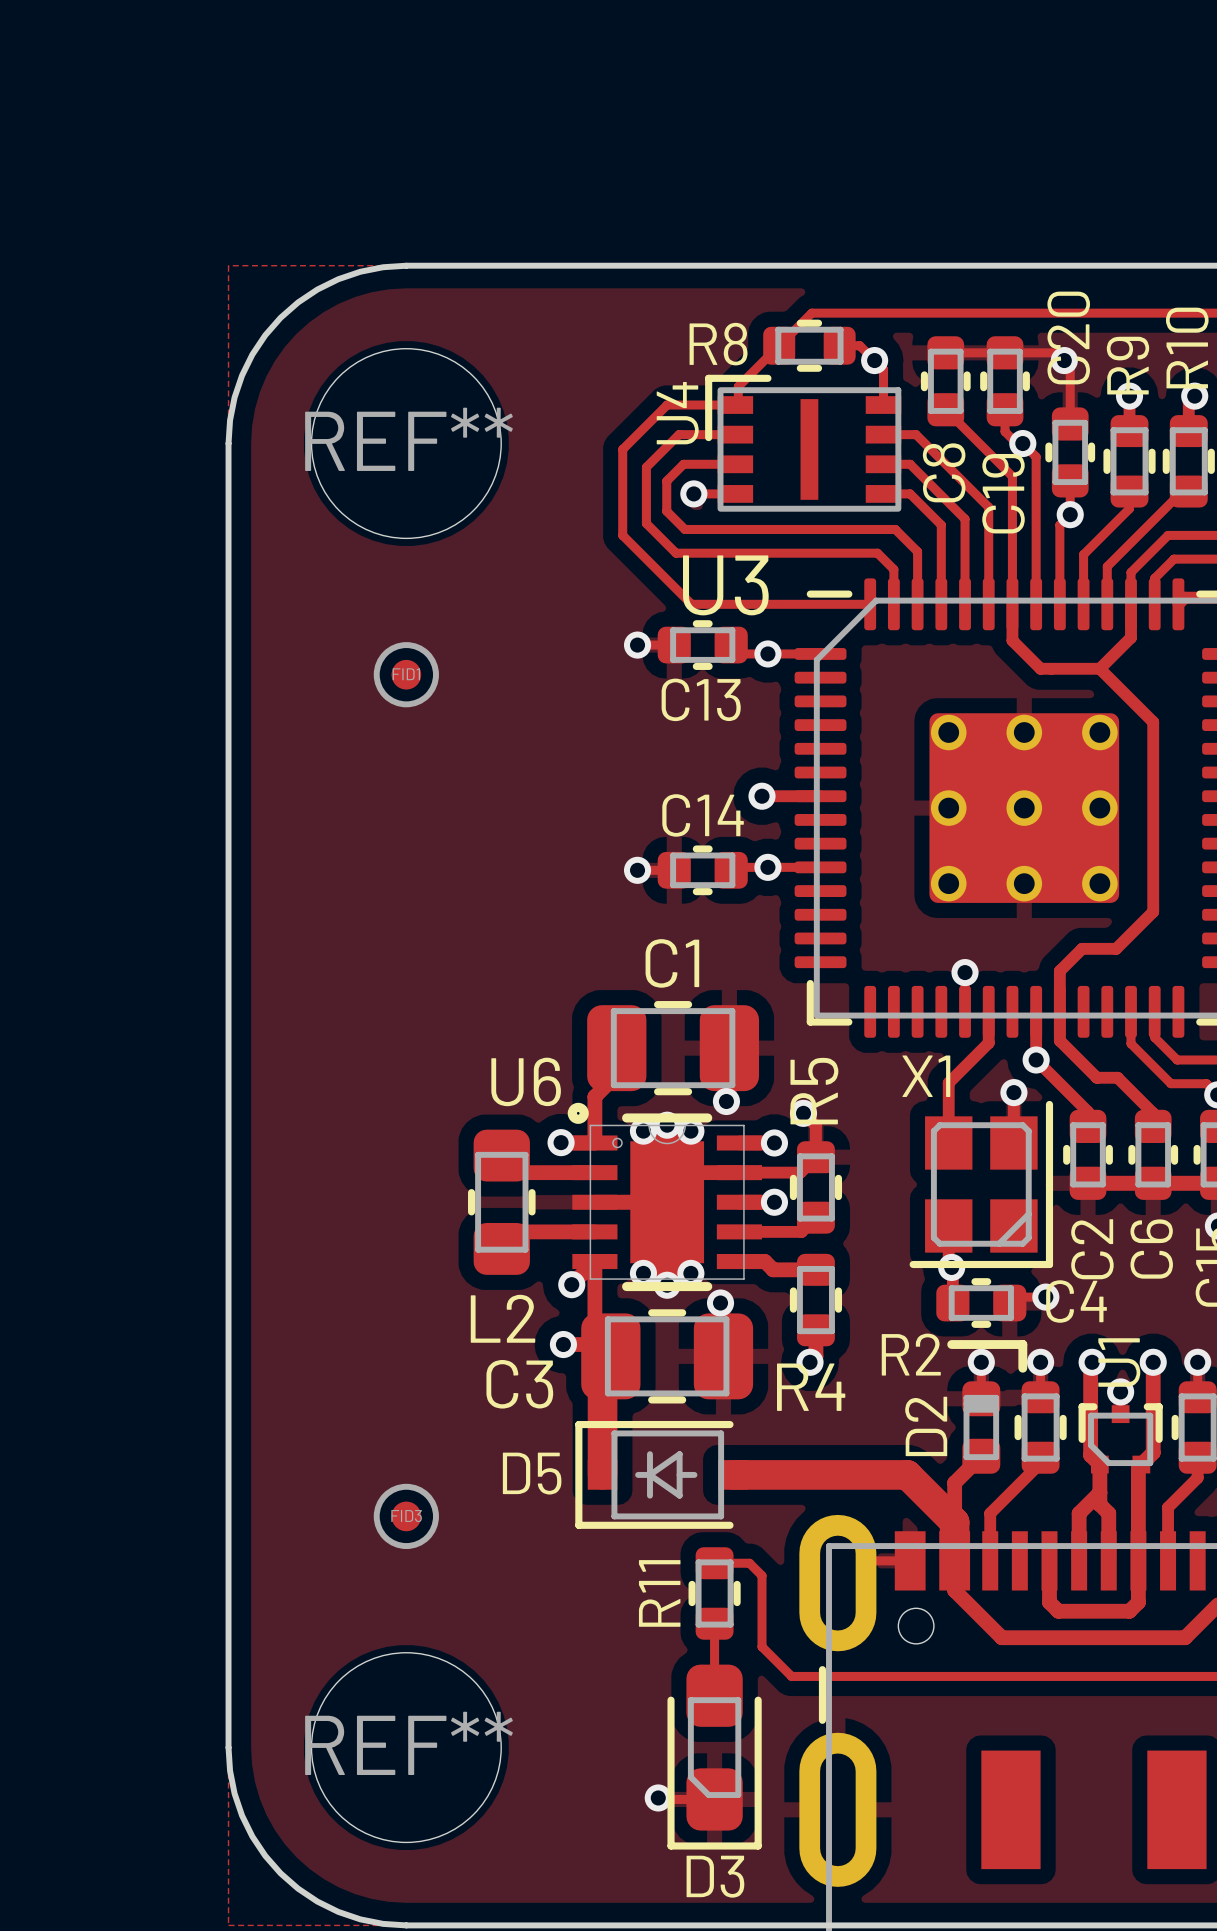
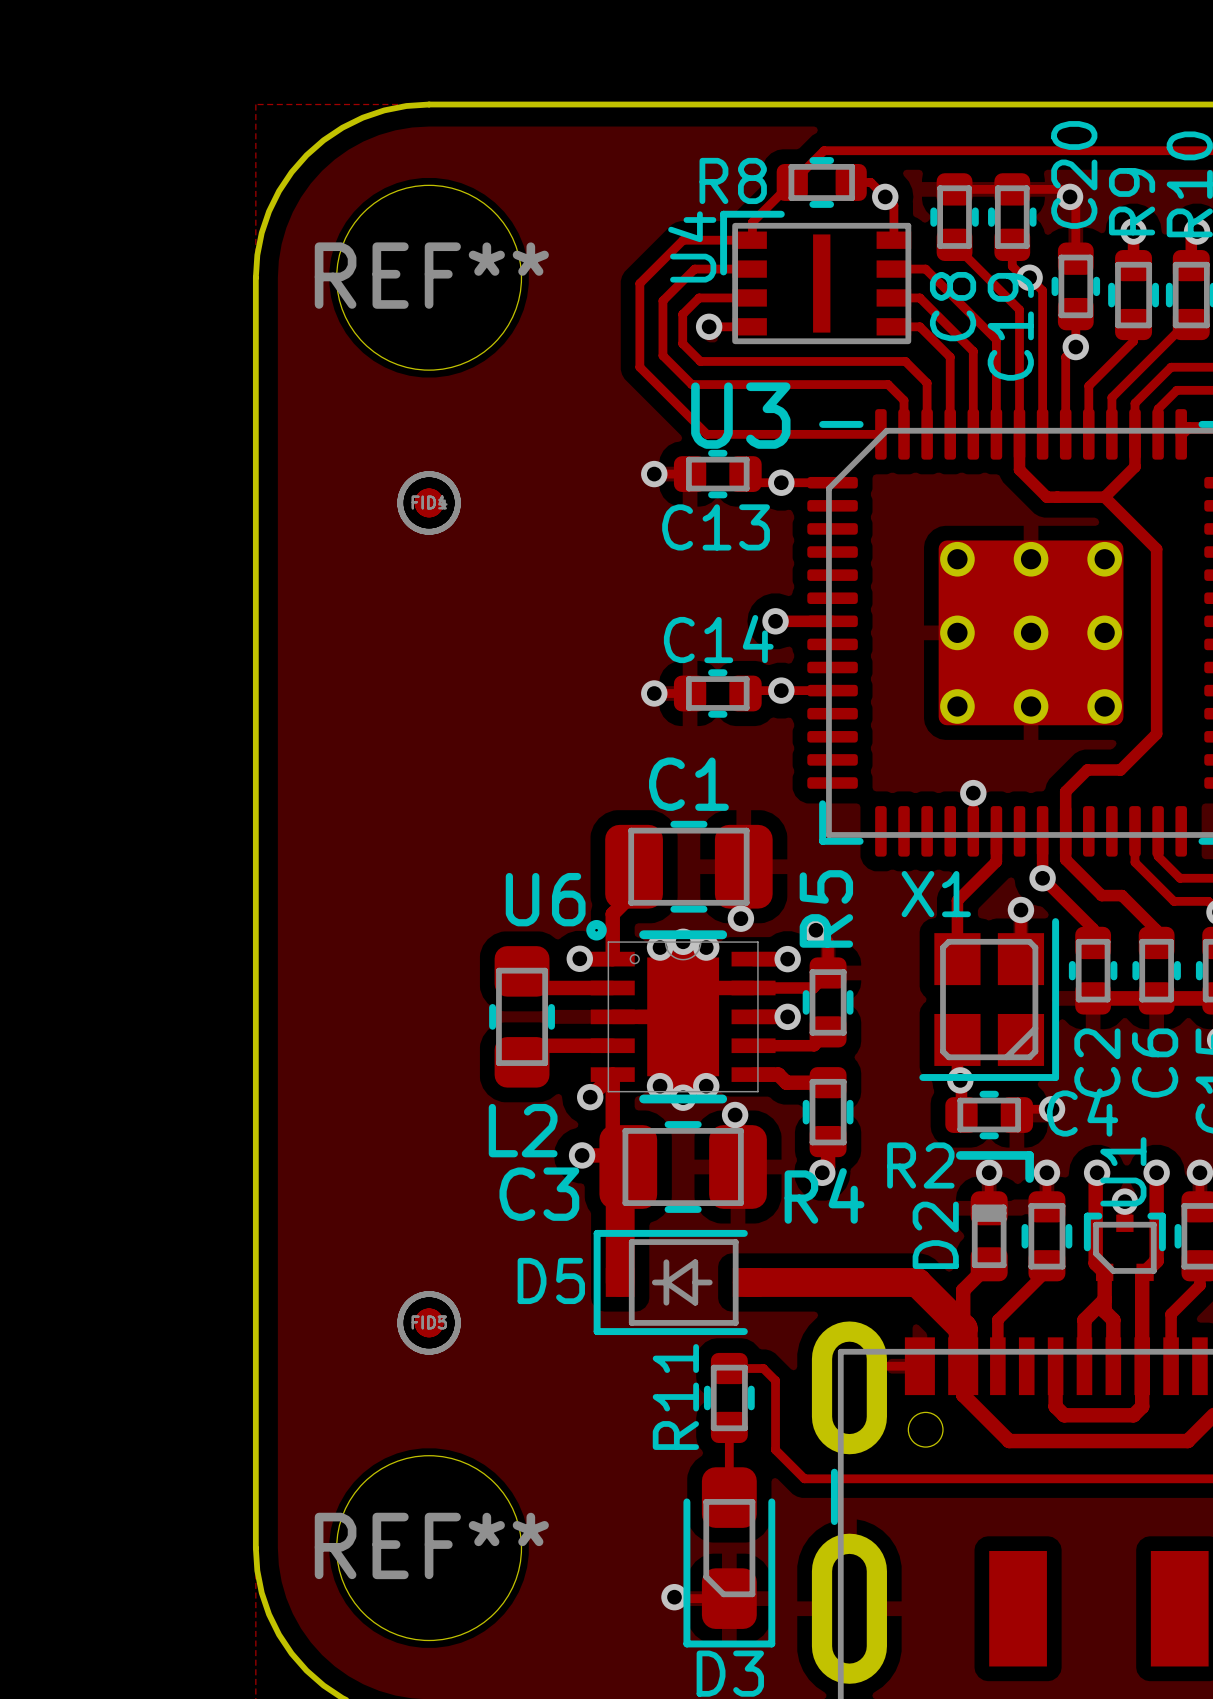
part: none -> (429, 502)
part: none -> (429, 1322)

